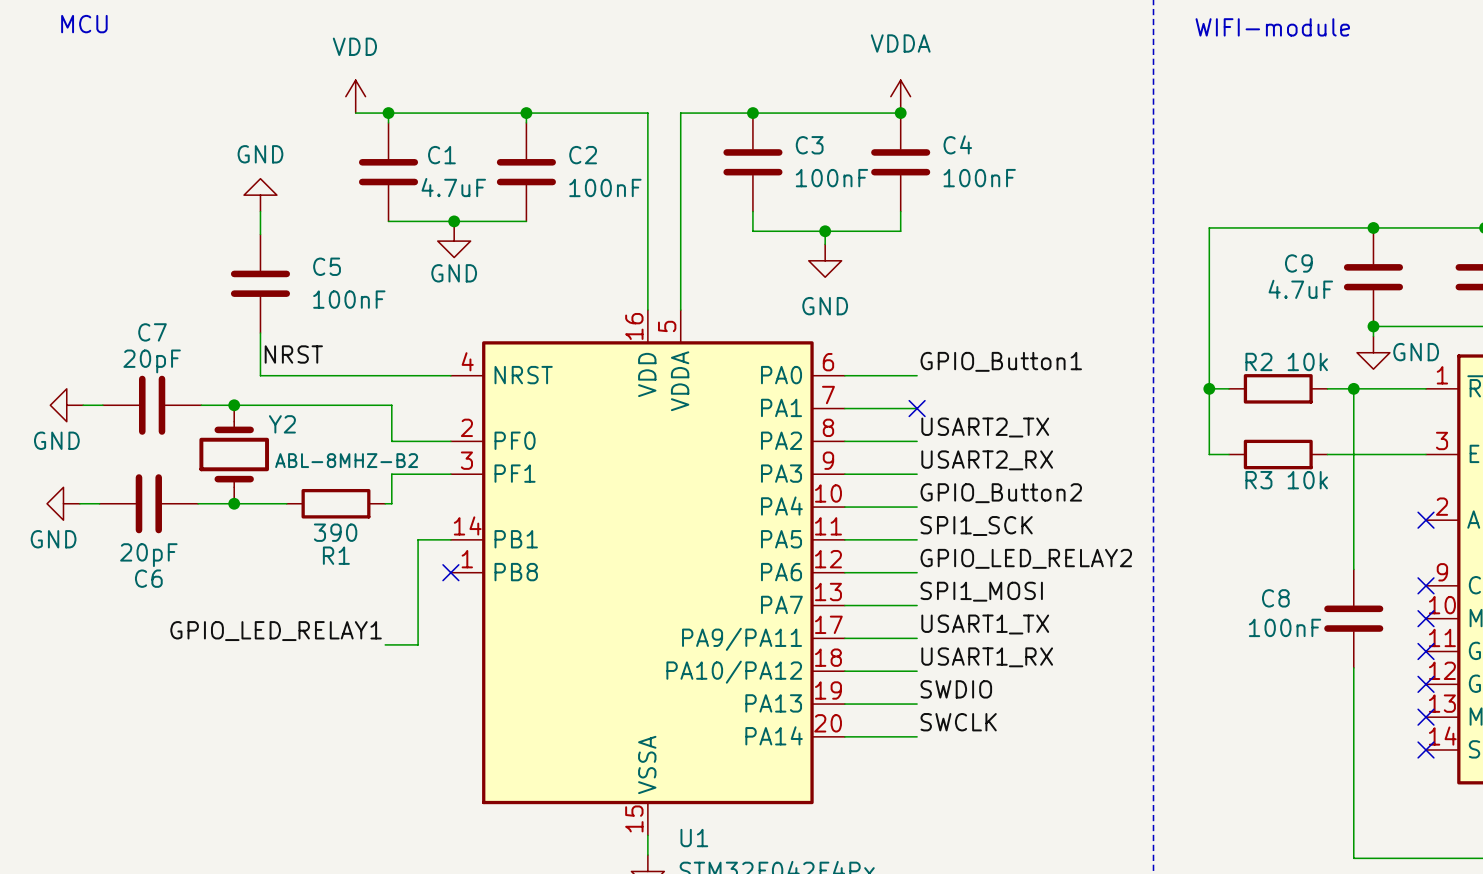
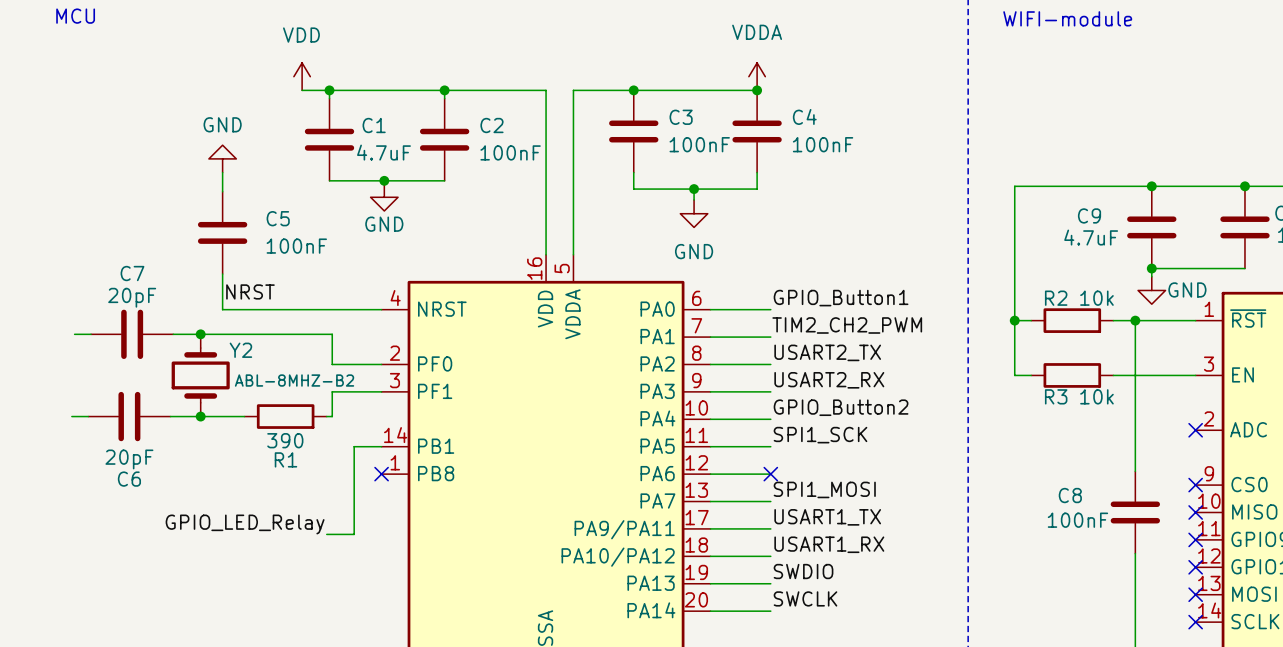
label: none -> TIM2_CH2_PWM (847, 325)
power symbol: GND (66, 405) -> none
no-connect mark: (917, 408) -> none
power symbol: GND (63, 503) -> none
label: GPIO_LED_RELAY2 (1026, 558) -> none
no-connect mark: none -> (770, 474)
label: GPIO_LED_RELAY1 (276, 631) -> GPIO_LED_Relay (245, 524)

